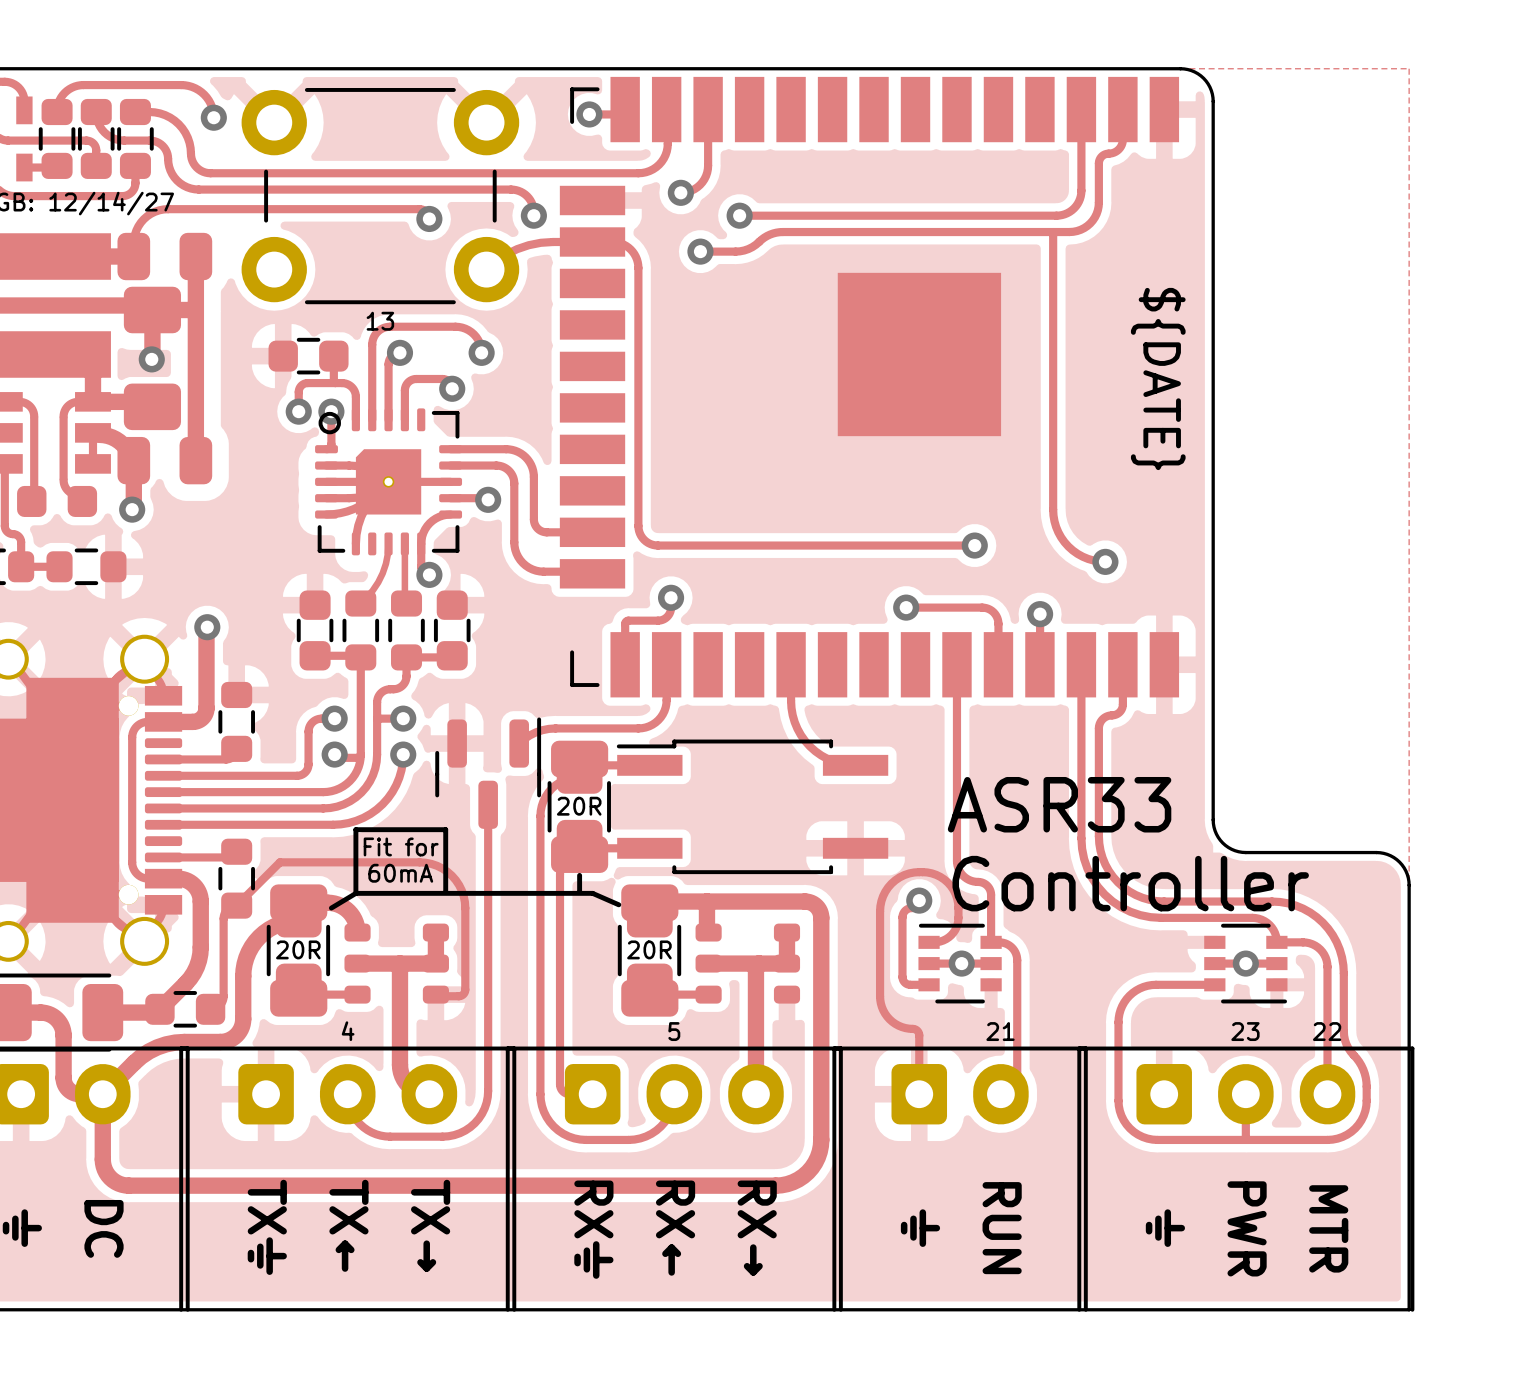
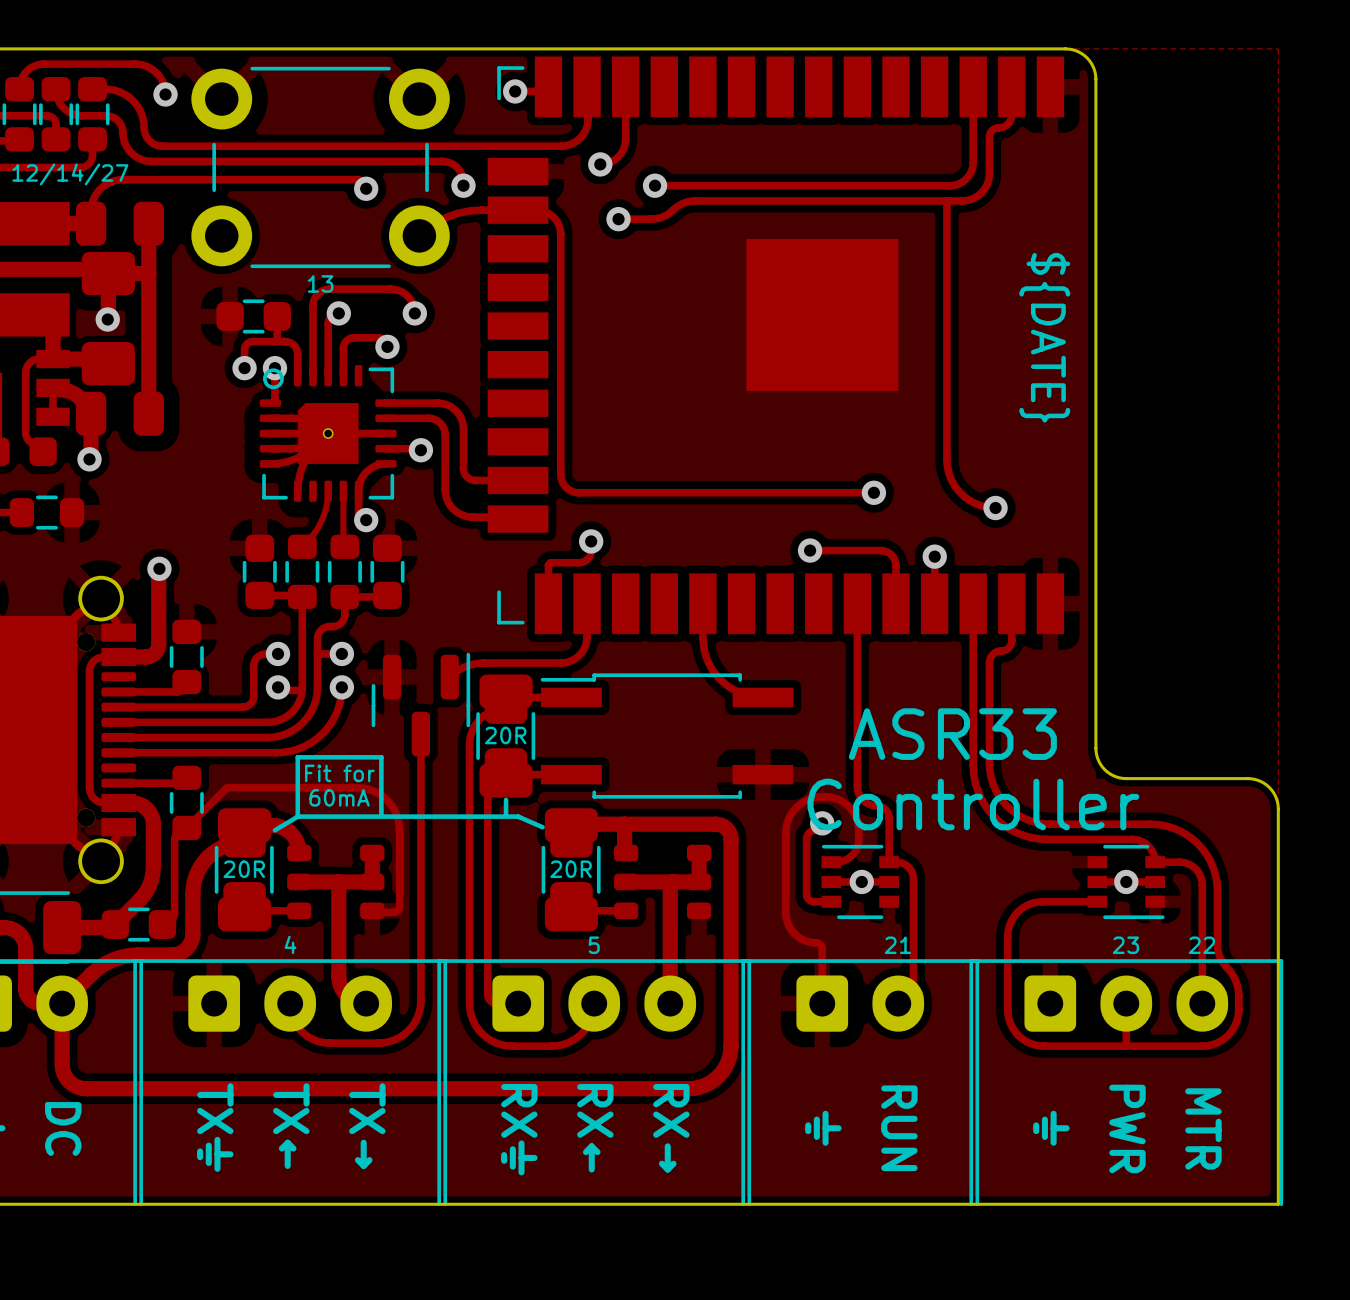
text position: Controller (1130, 883) -> Controller (973, 804)

